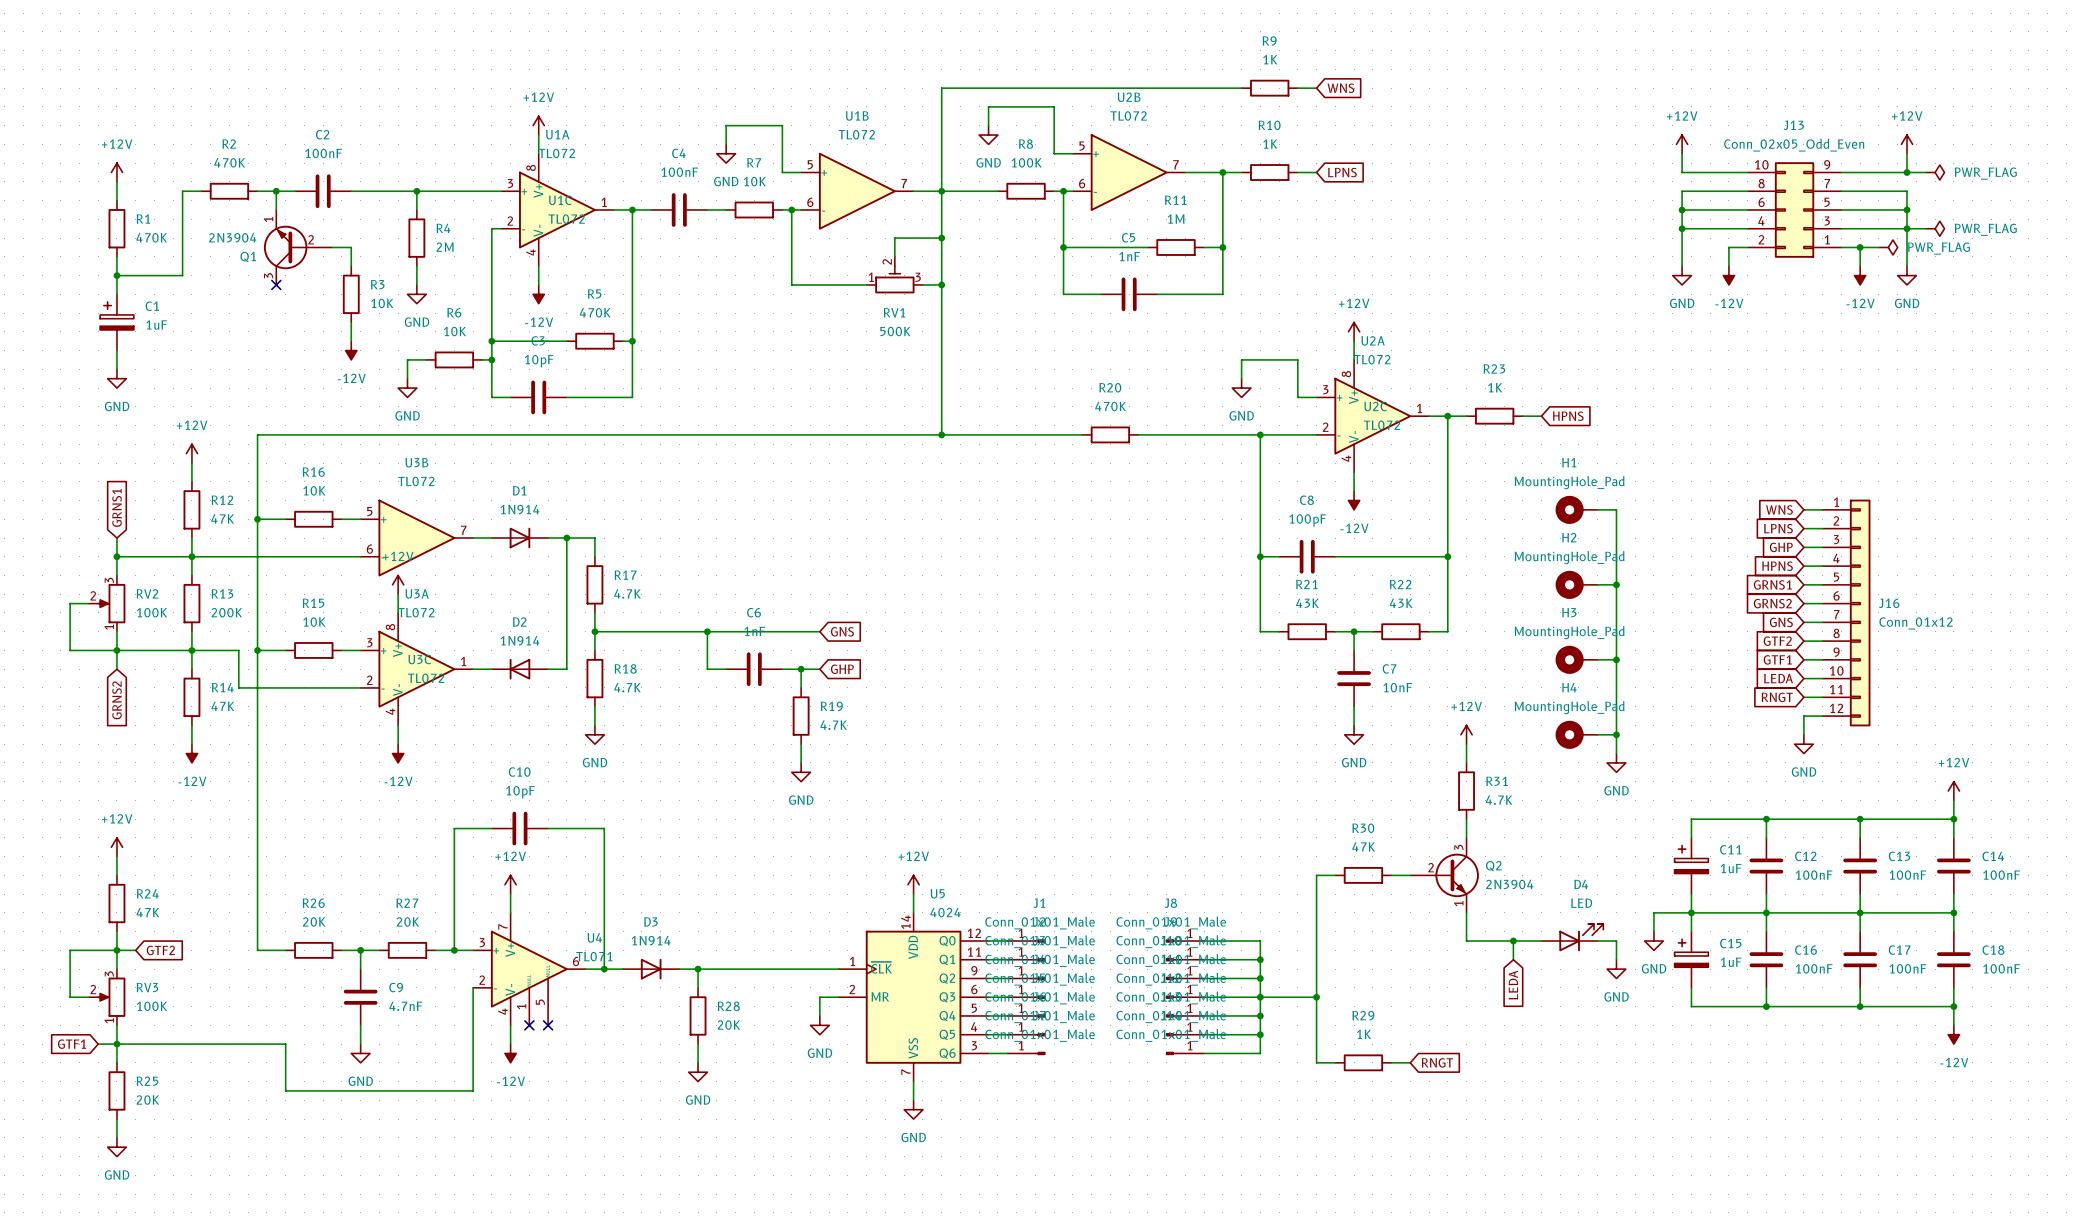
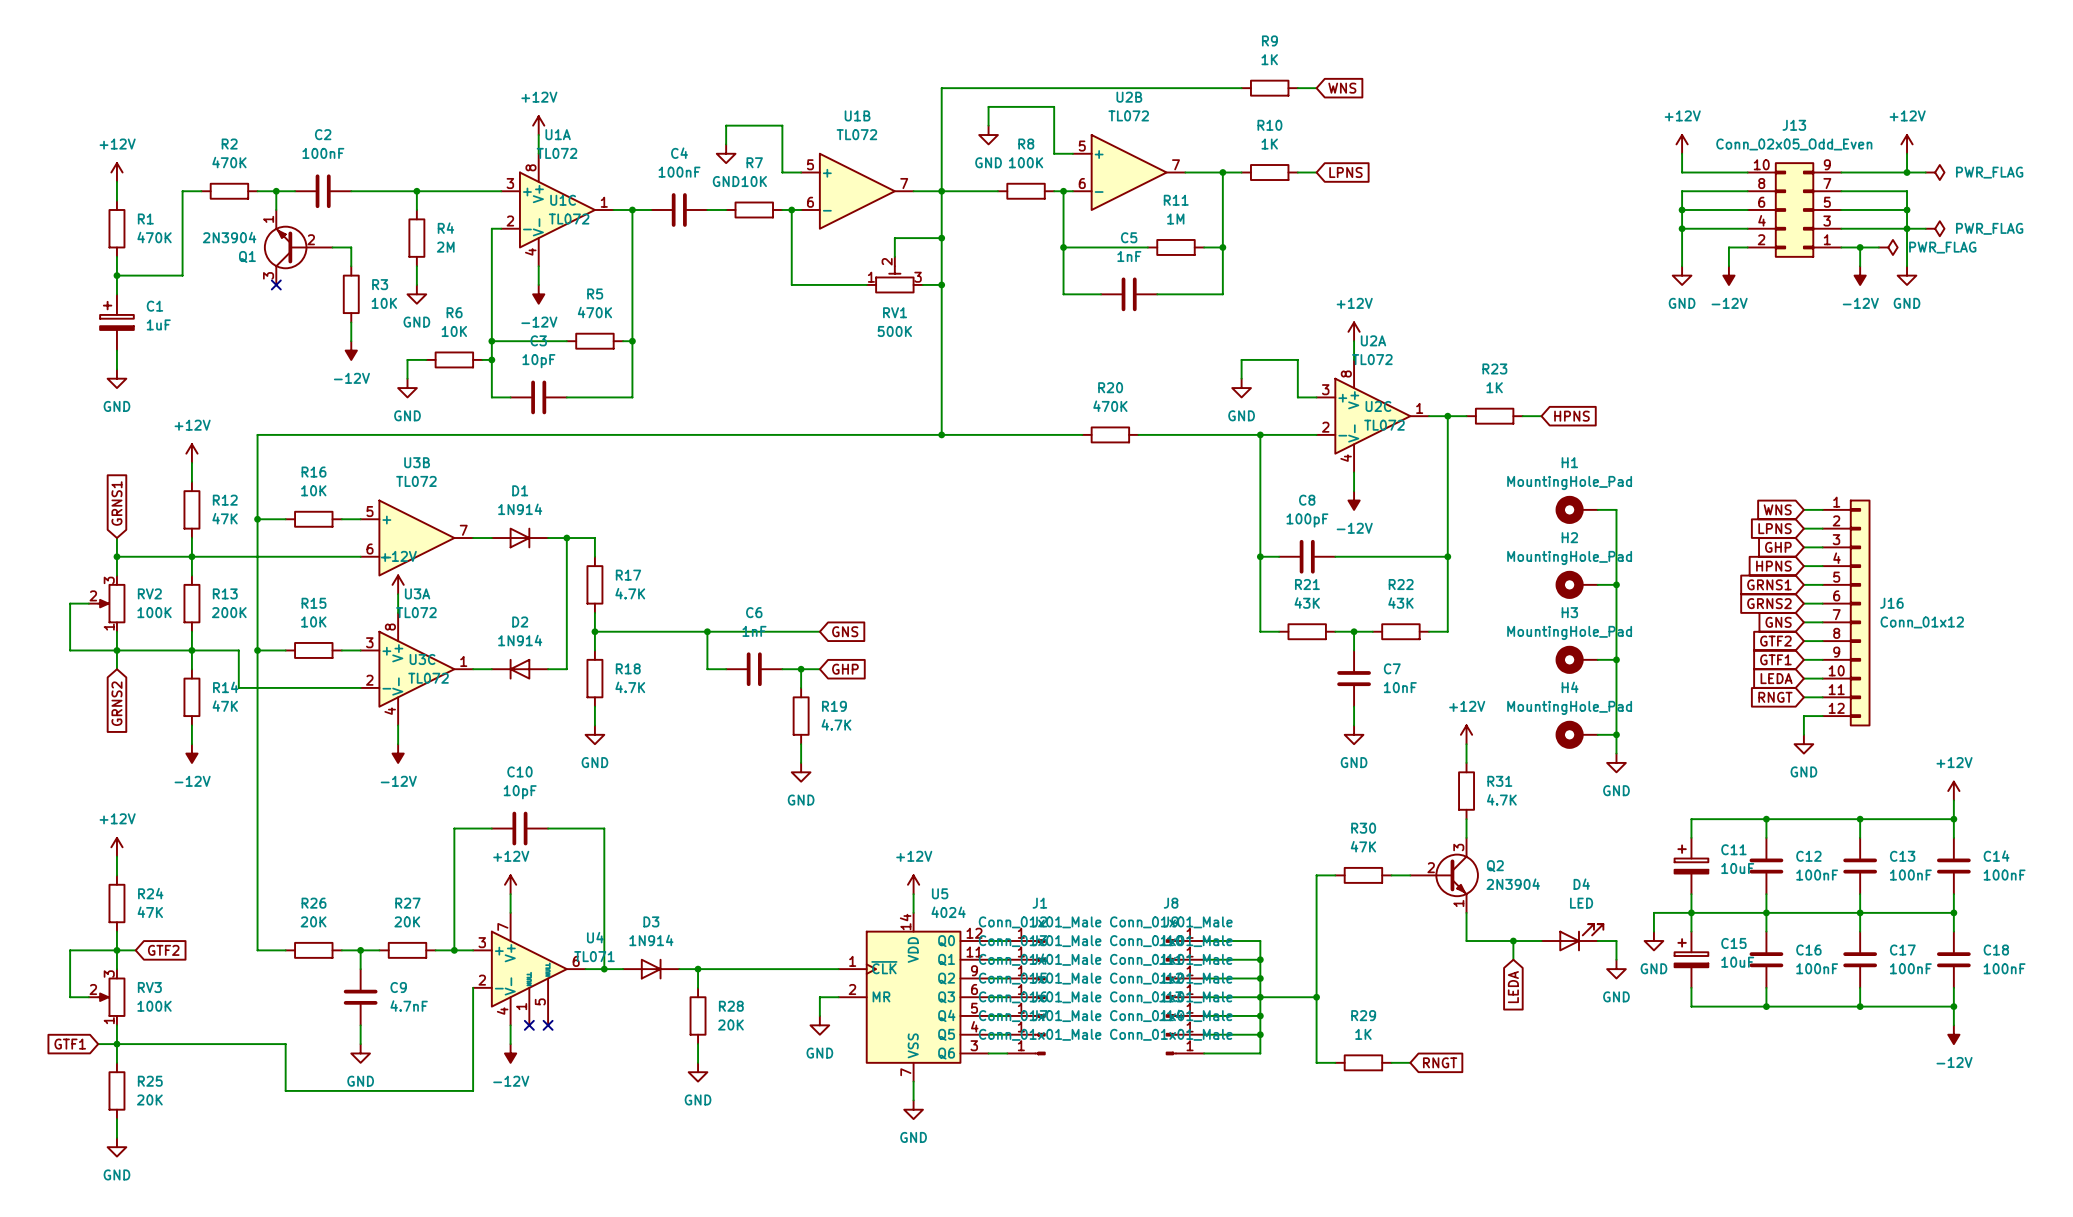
C11 value: 1uF (1731, 868) -> 10uF (1737, 868)
C15 value: 1uF (1731, 962) -> 10uF (1737, 962)

